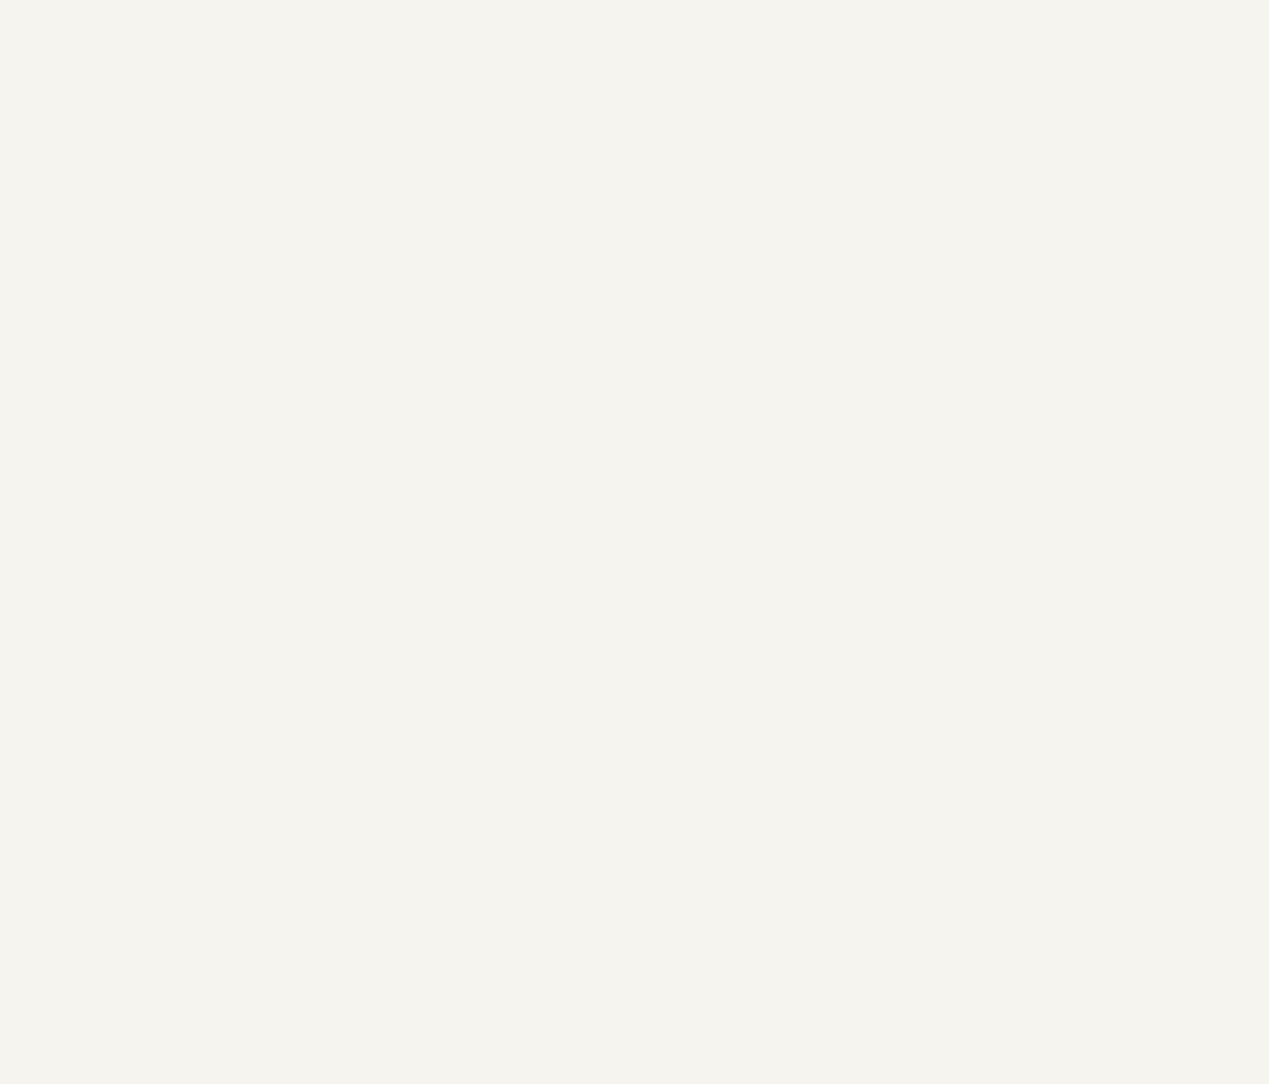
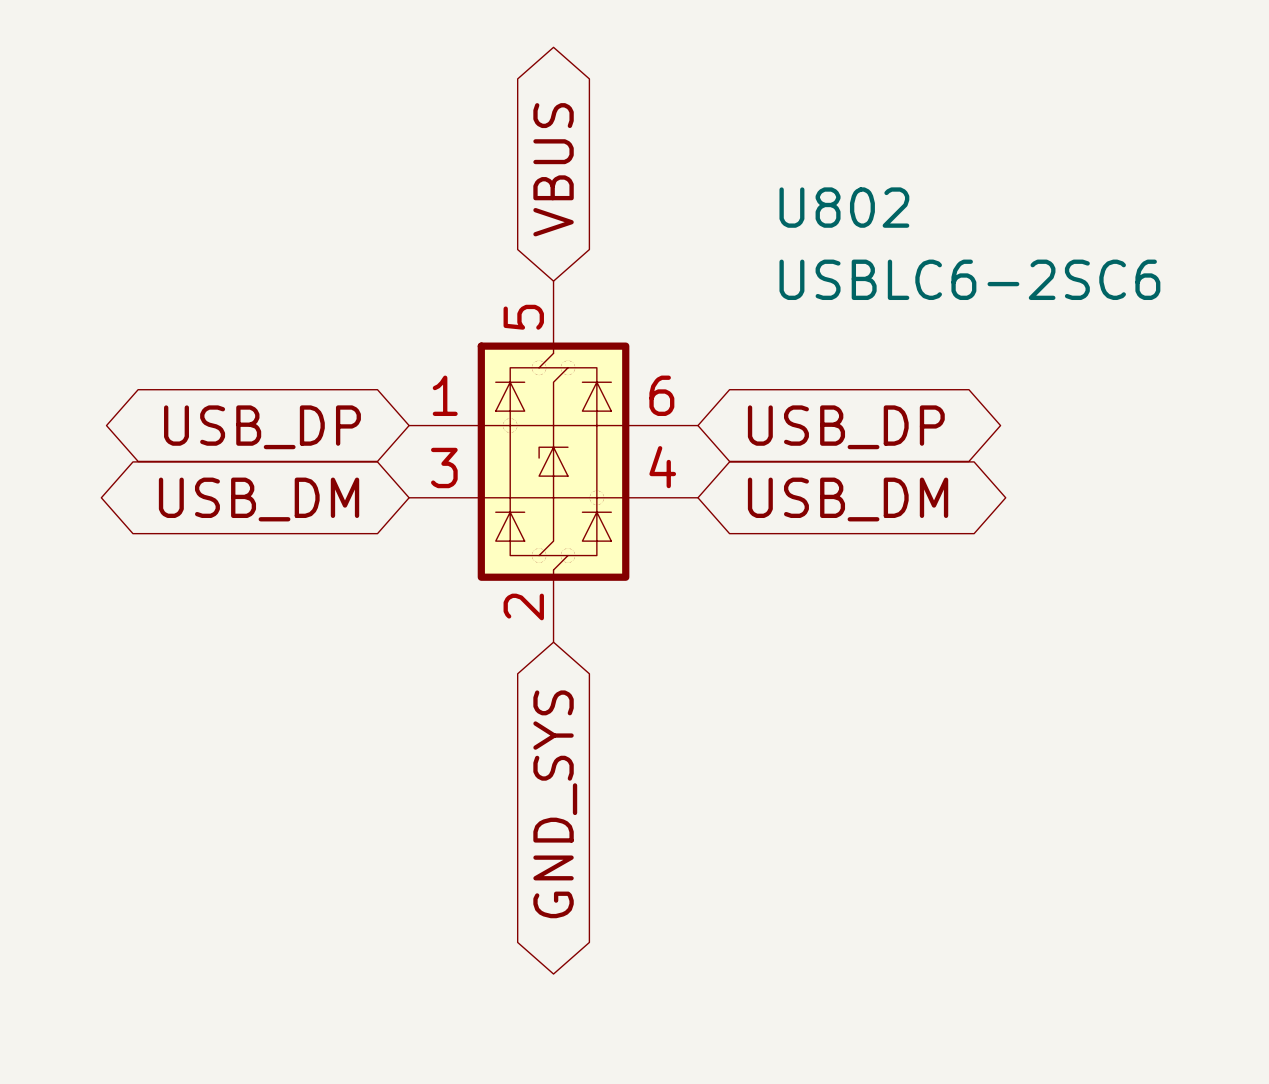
global label: none -> VBUS (553, 169)
global label: none -> USB_DP (262, 427)
global label: none -> USB_DP (846, 427)
U802: none -> USBLC6-2SC6 (553, 461)
global label: none -> USB_DM (259, 499)
global label: none -> USB_DM (848, 499)
global label: none -> GND_SYS (555, 804)

